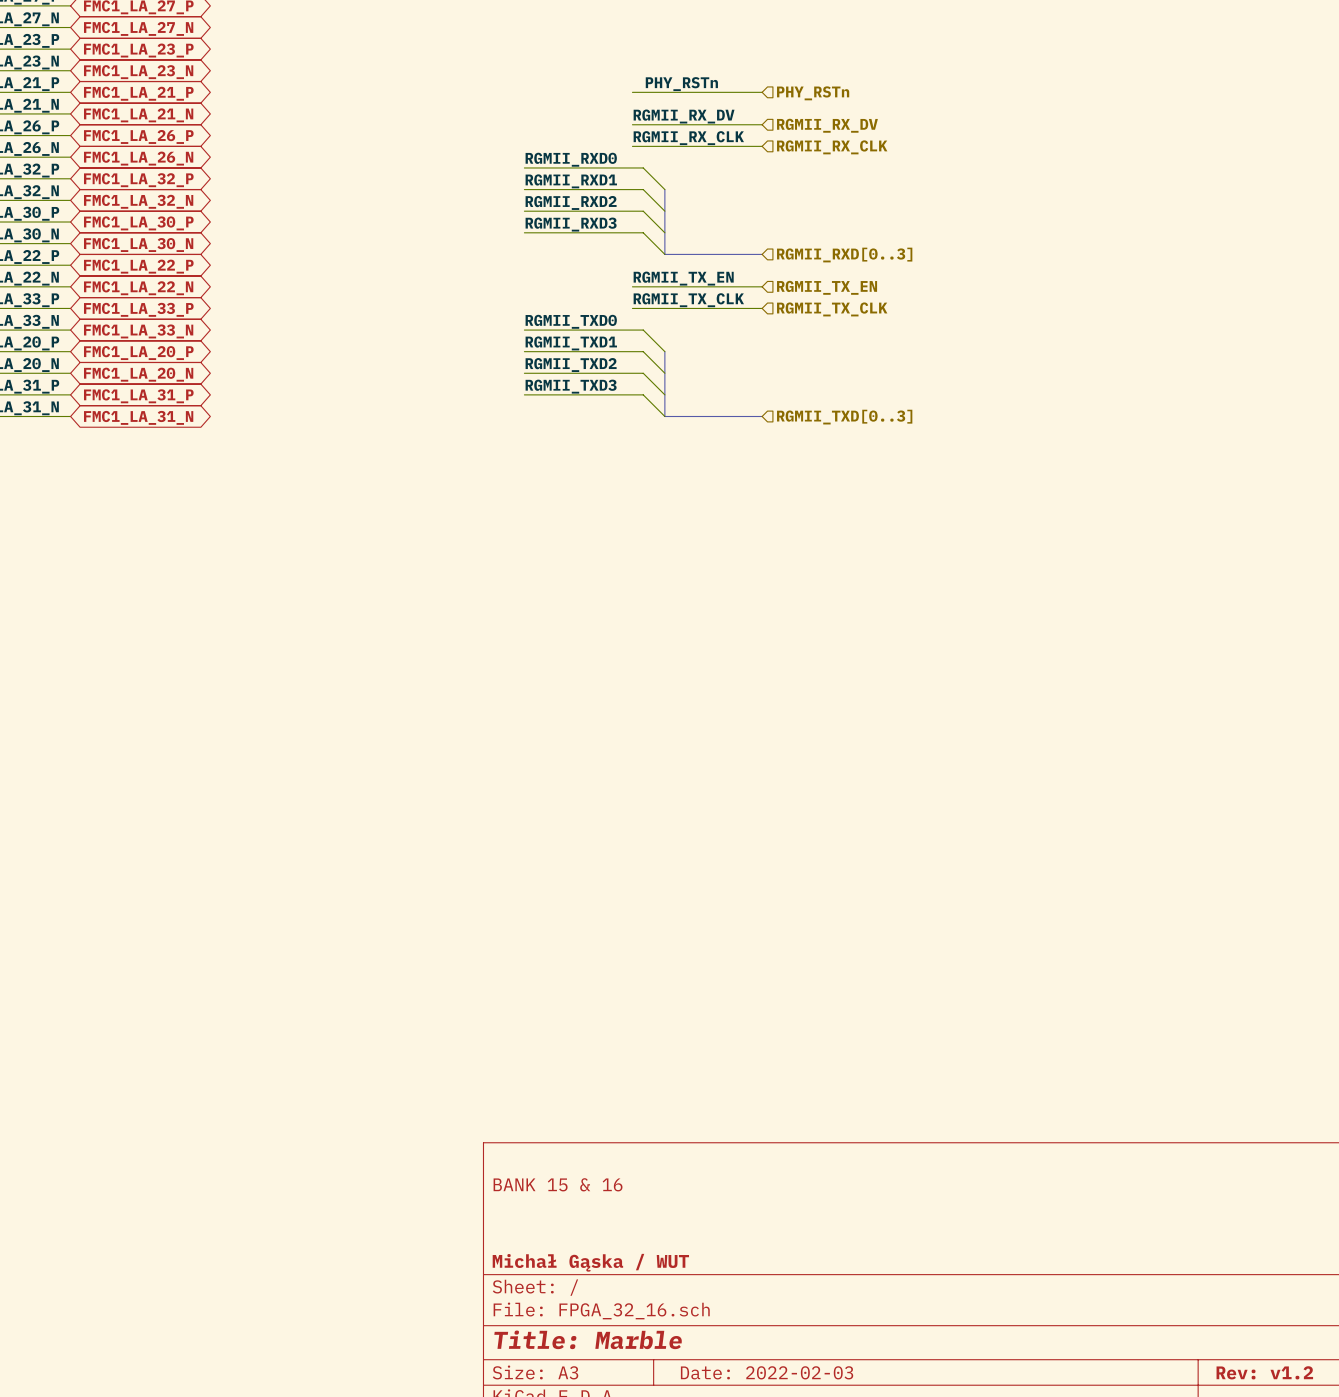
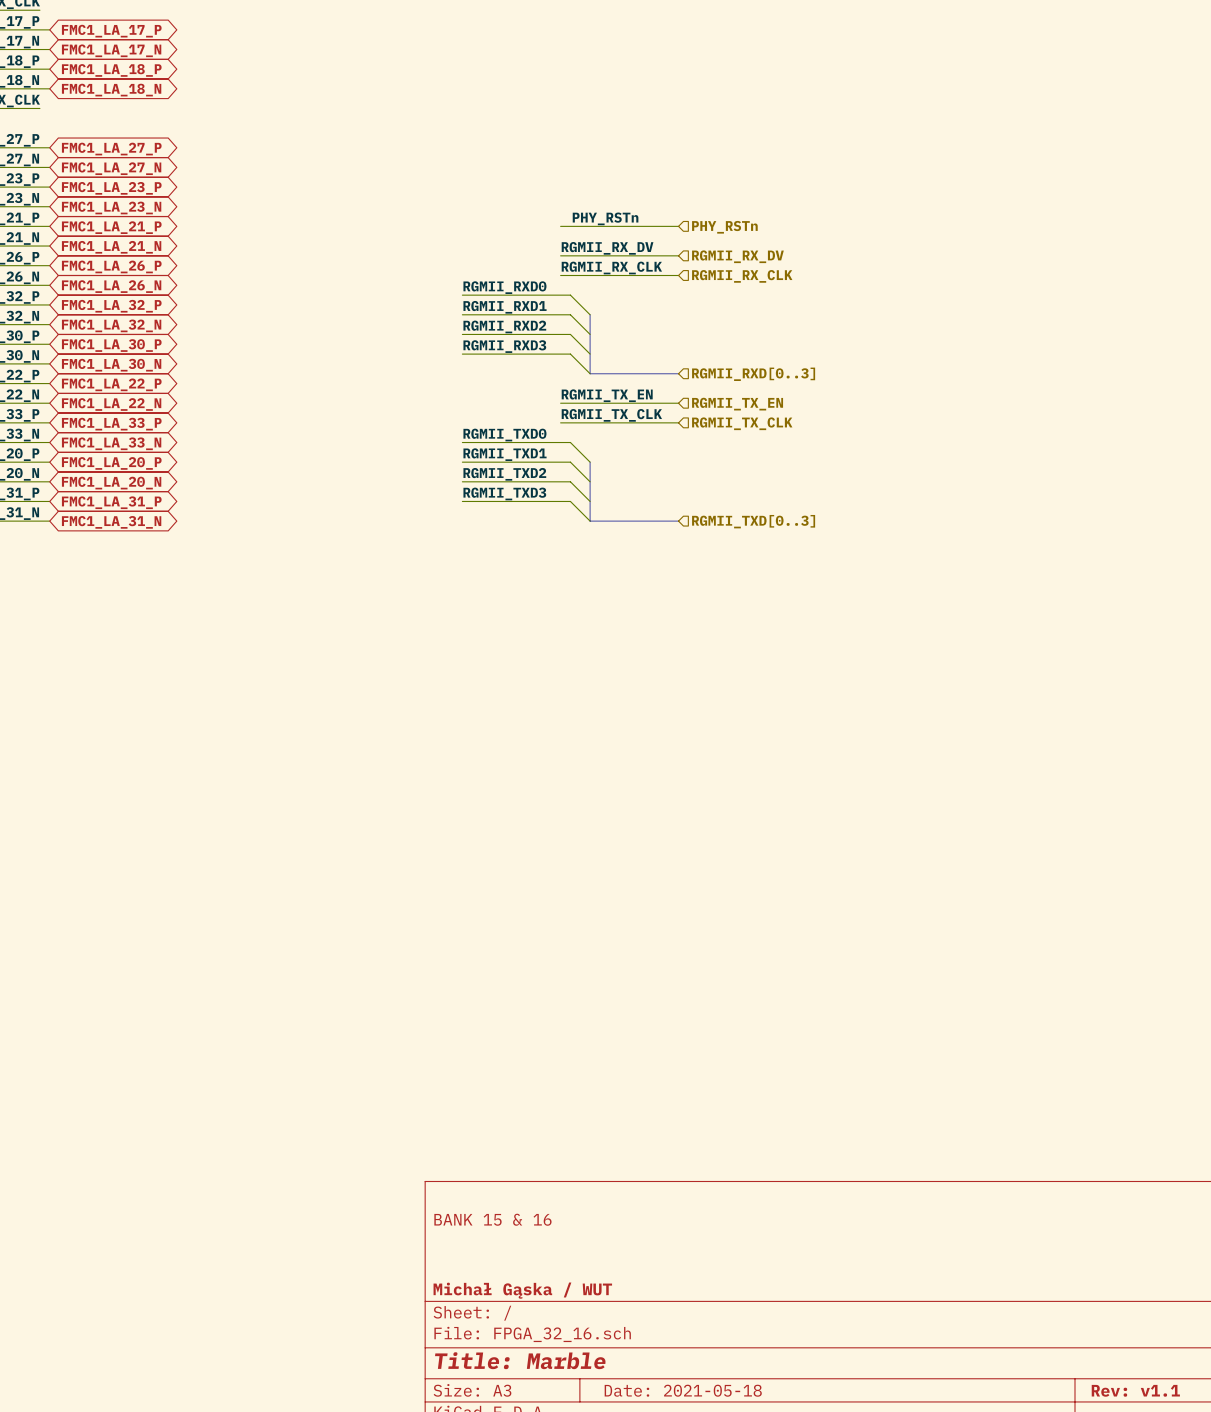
title block: Date: 2022-02-03 (767, 1372) -> Date: 2021-05-18 (683, 1390)
title block: Rev: v1.2 (1264, 1372) -> Rev: v1.1 (1135, 1390)

